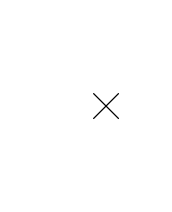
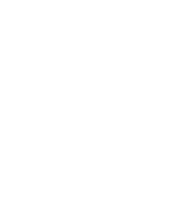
no-connect mark: (106, 106) -> none

